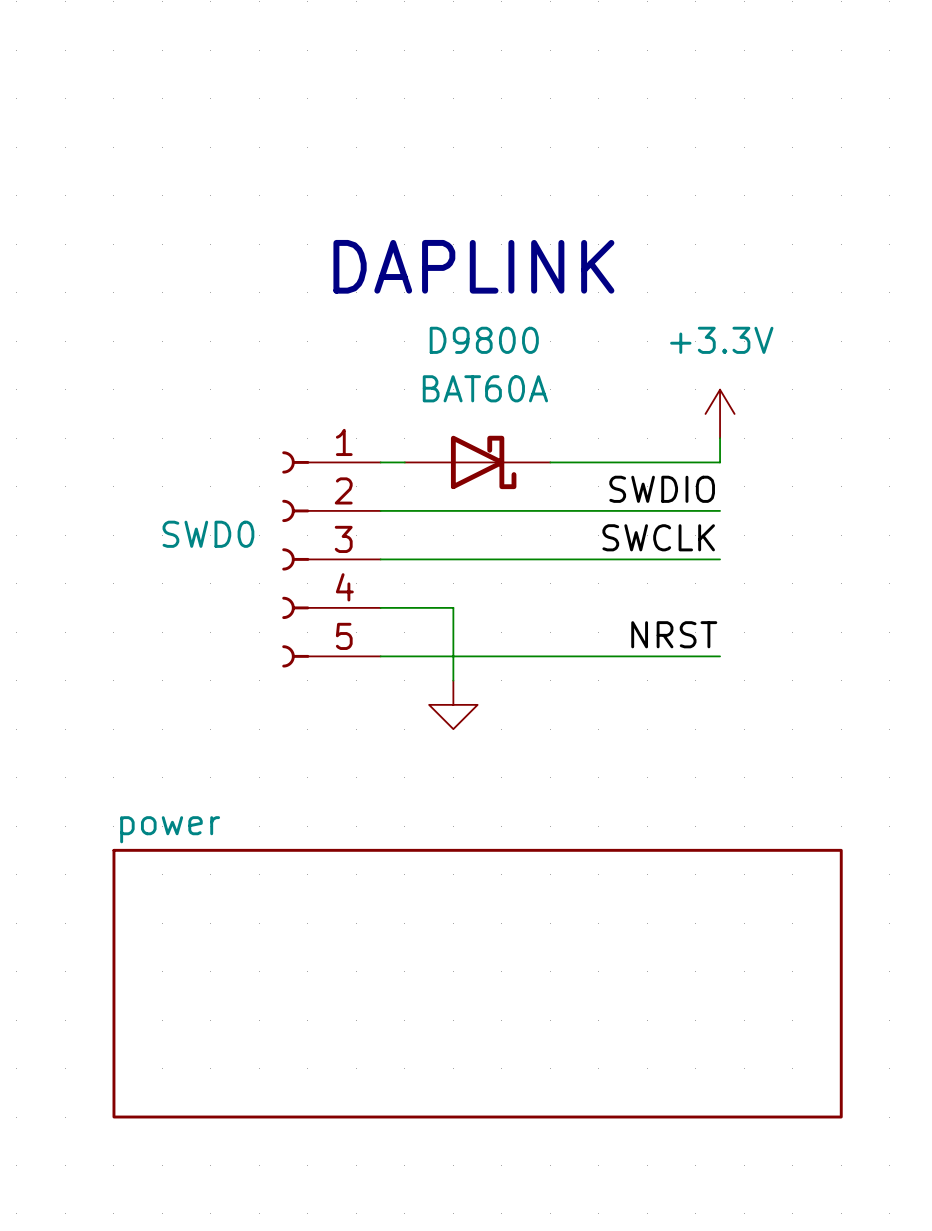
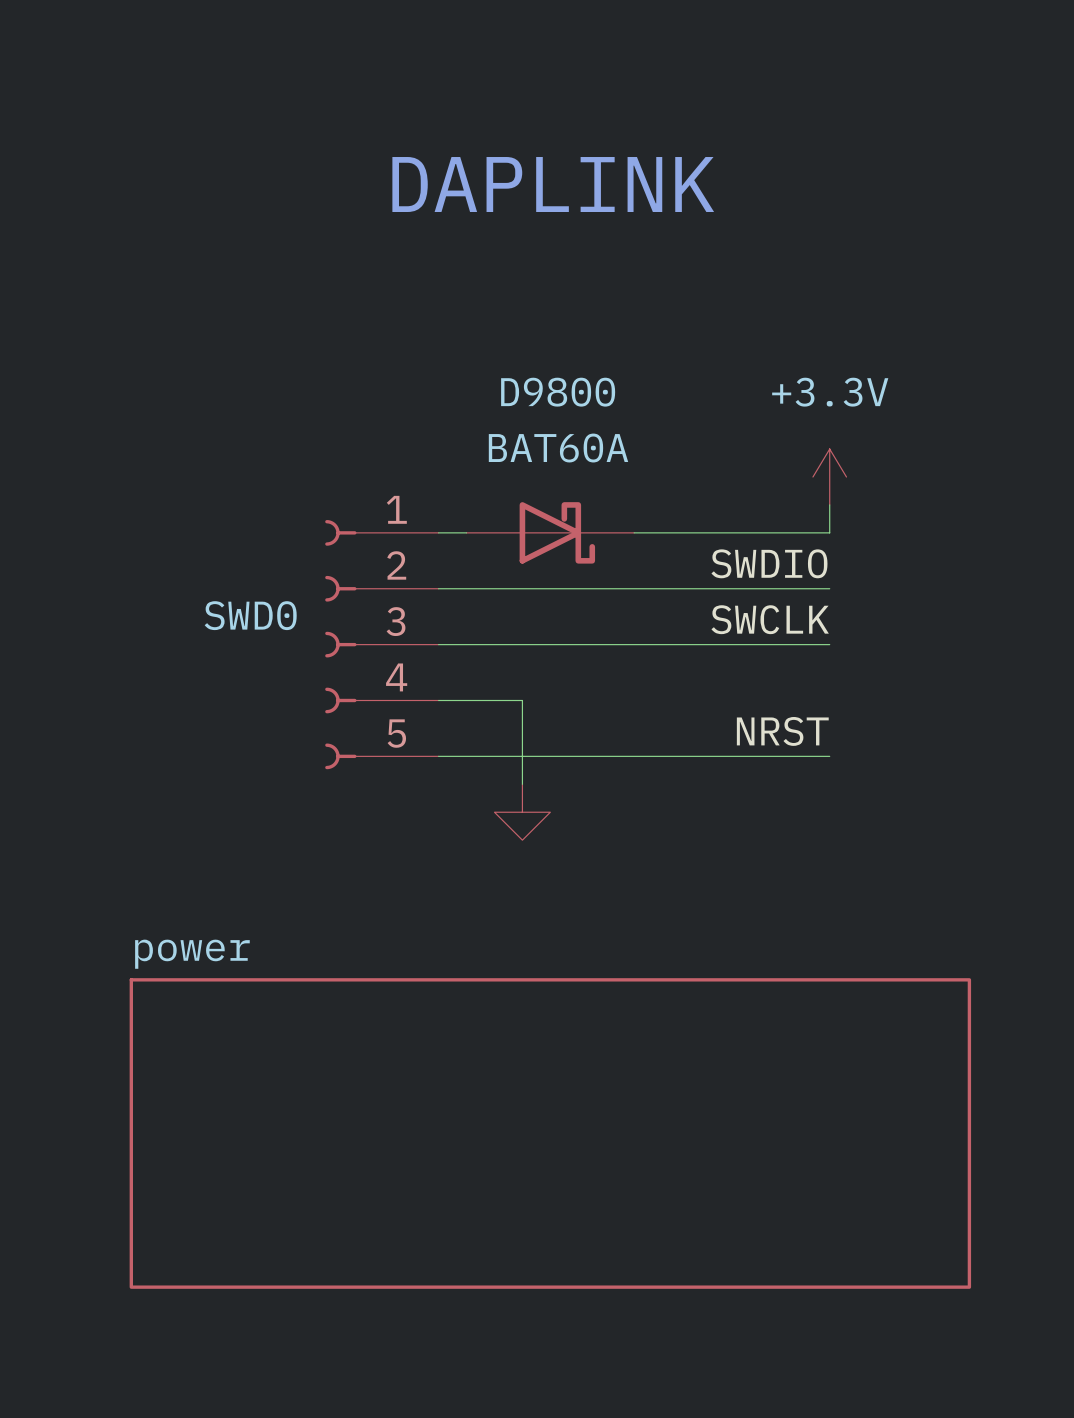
text position: DAPLINK (473, 266) -> DAPLINK (553, 184)

